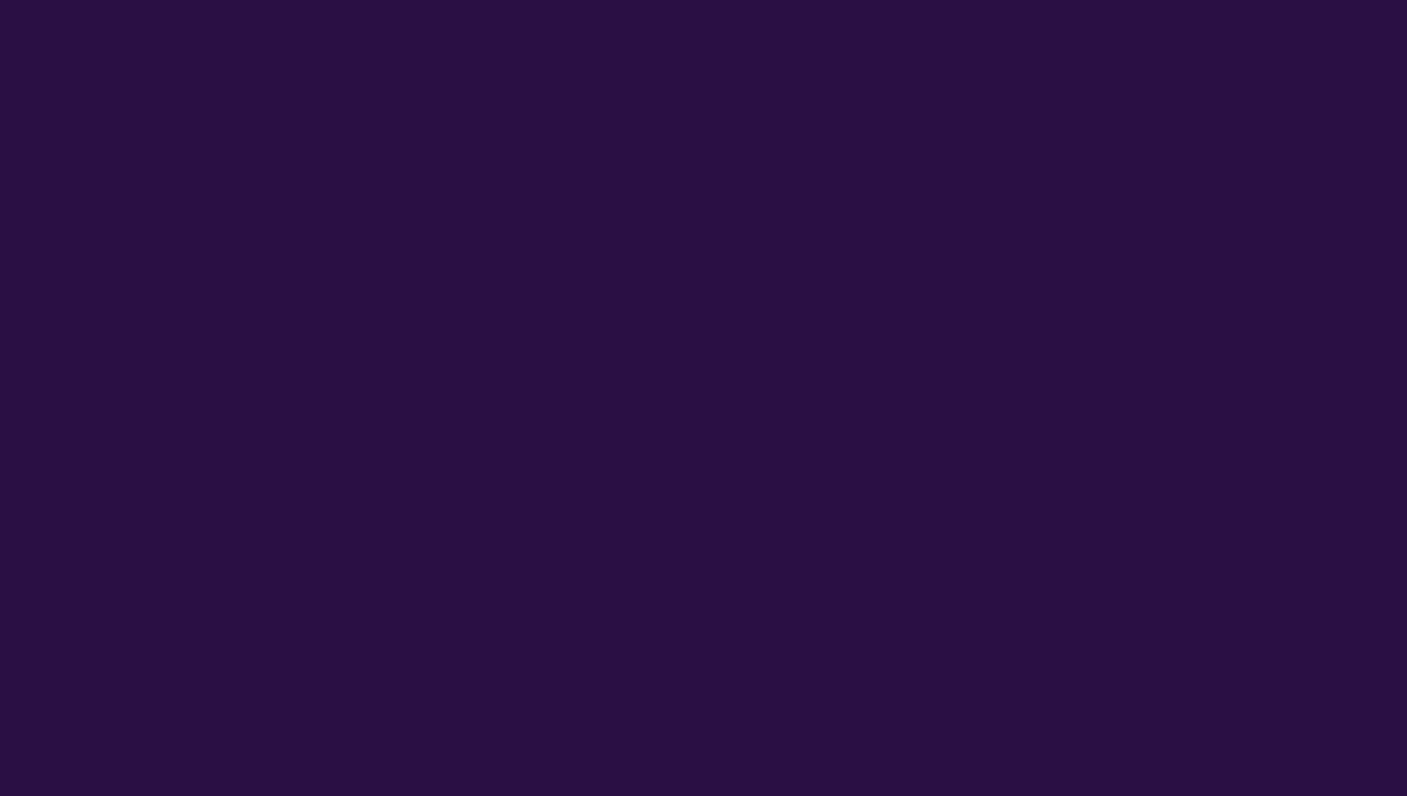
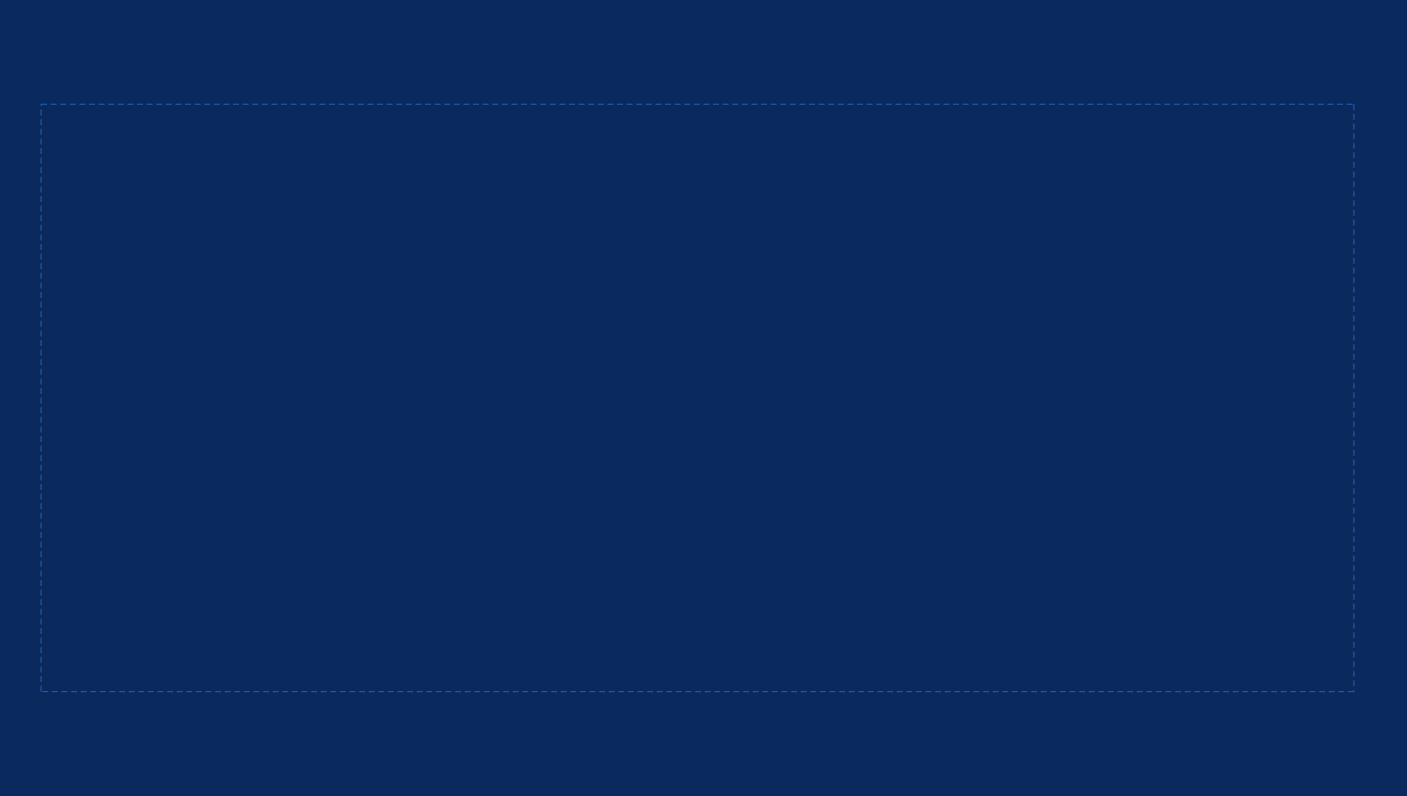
zone outline: none -> (1353, 104) (1353, 691) (41, 691) (41, 104) (1353, 104)

